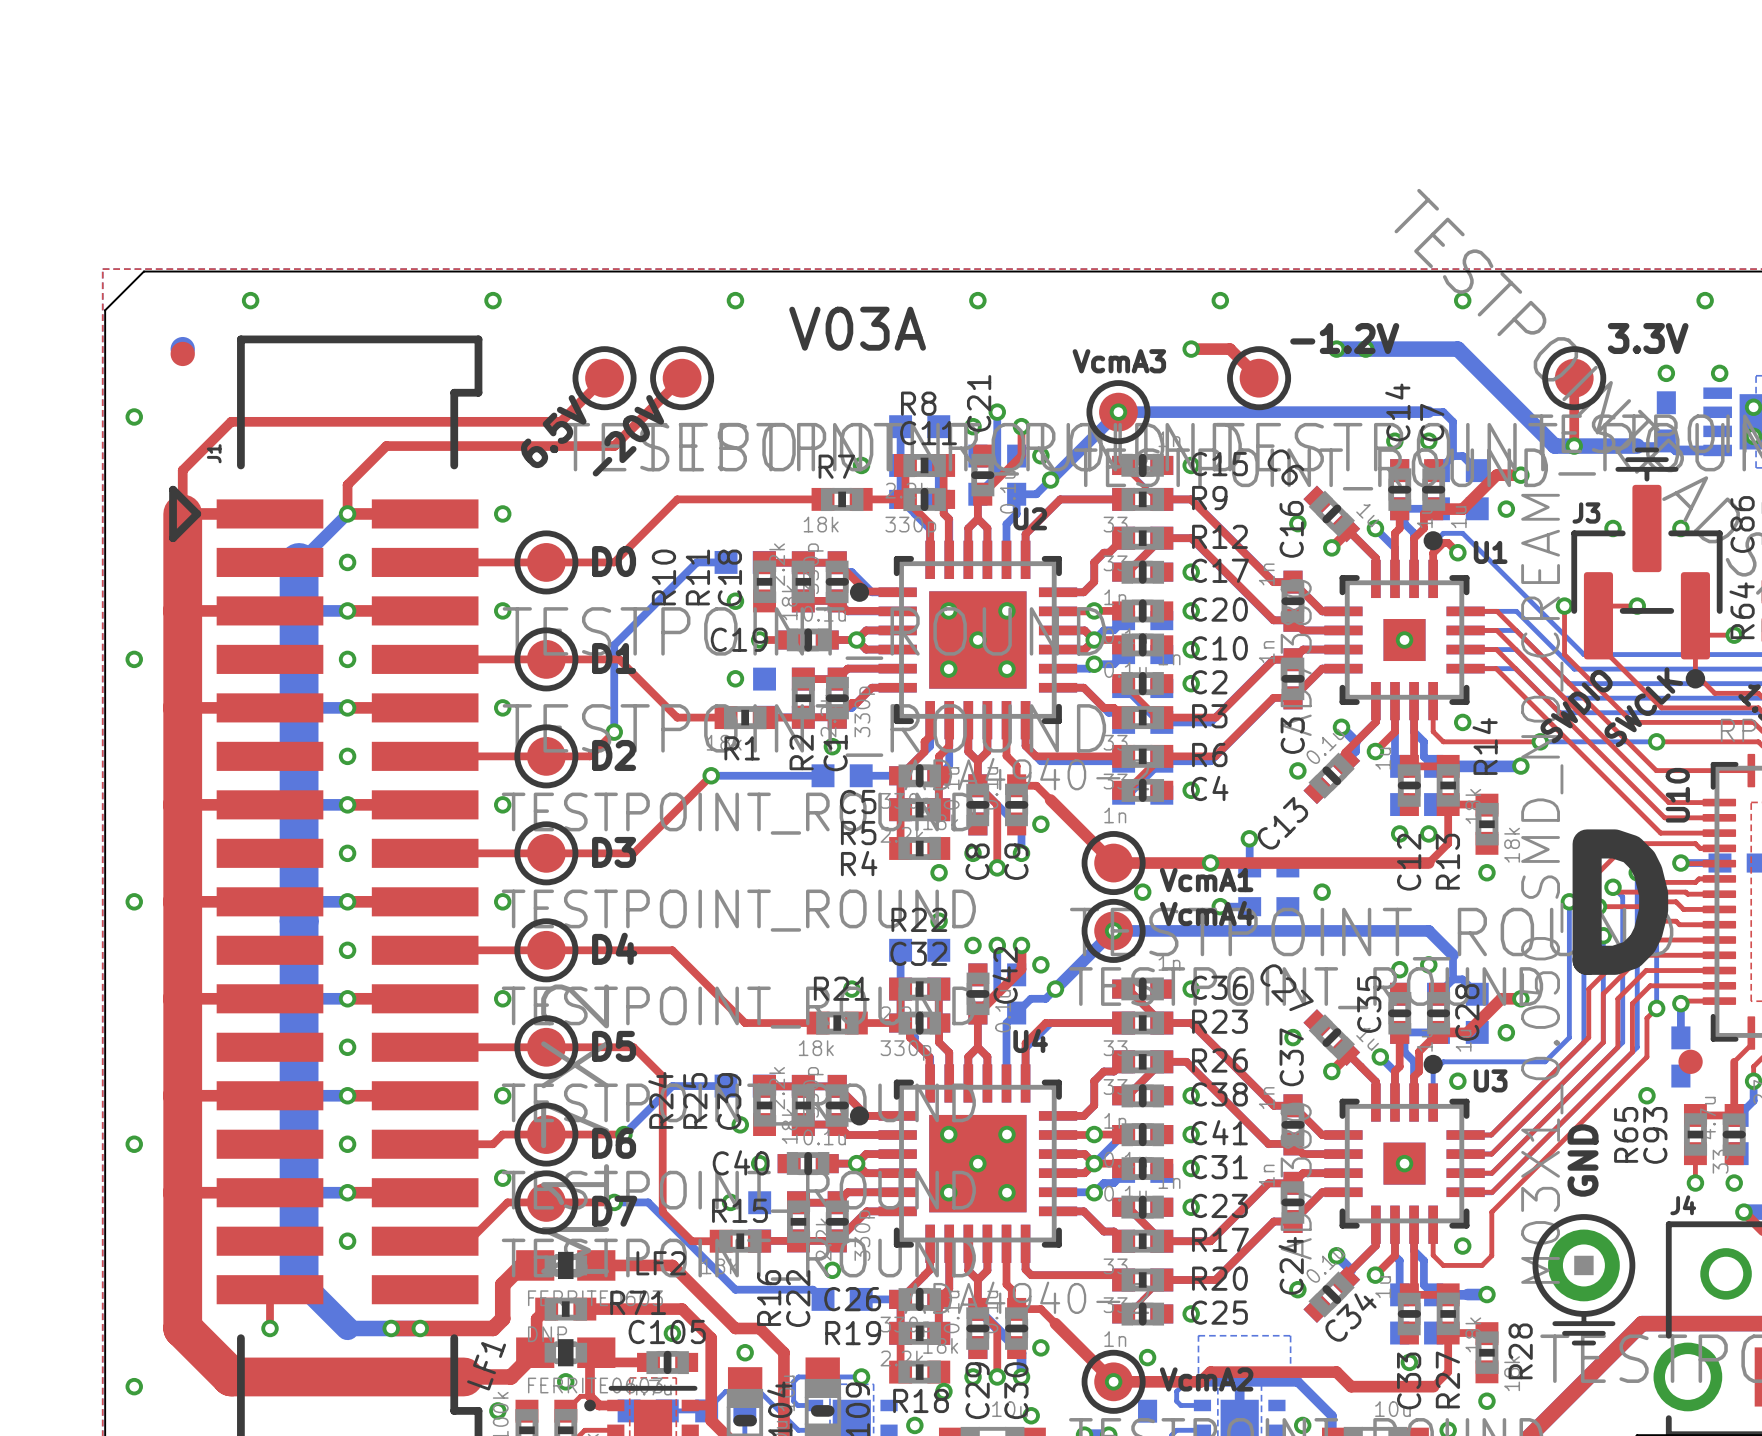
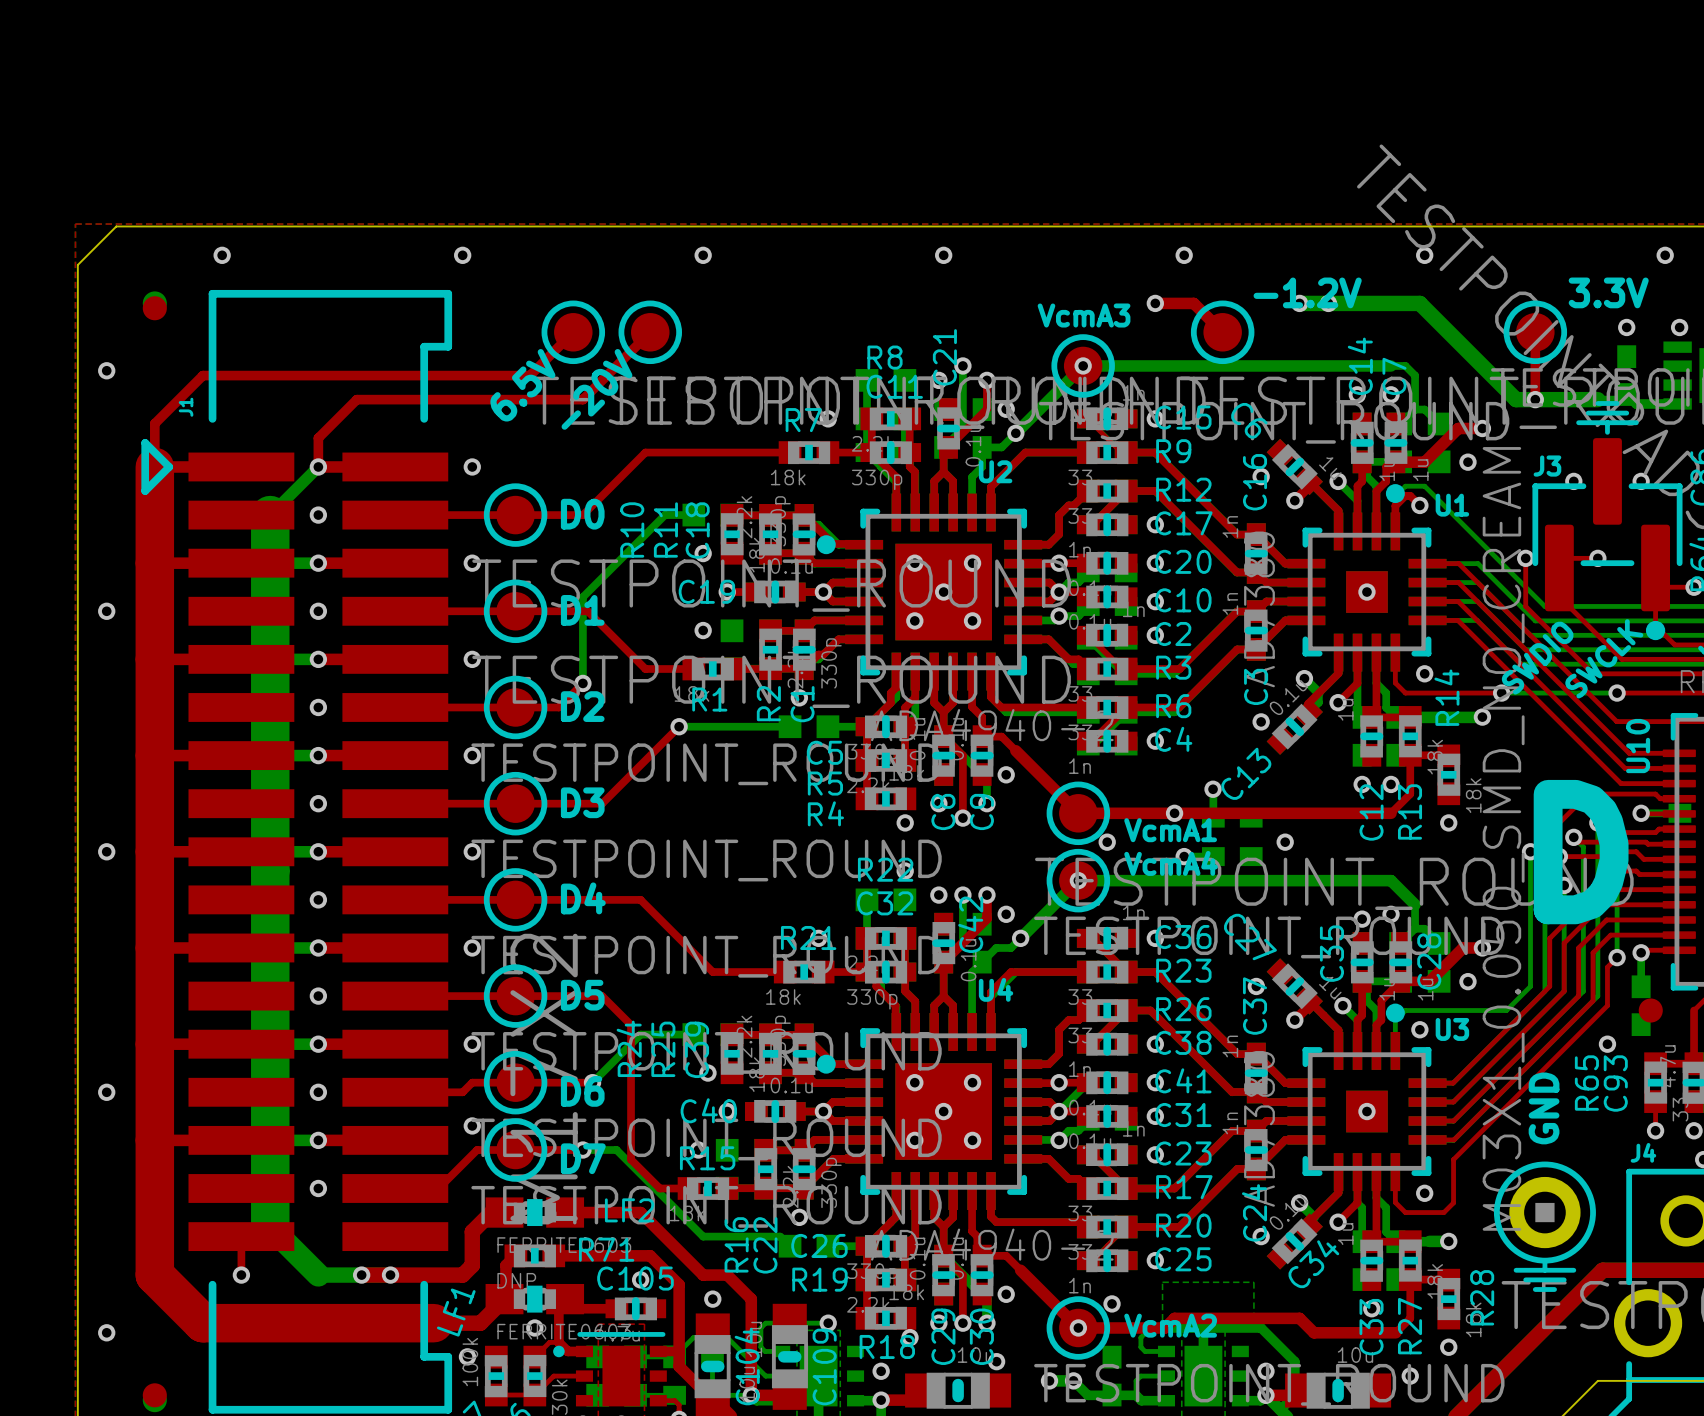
text: V03A (857, 328) -> none

